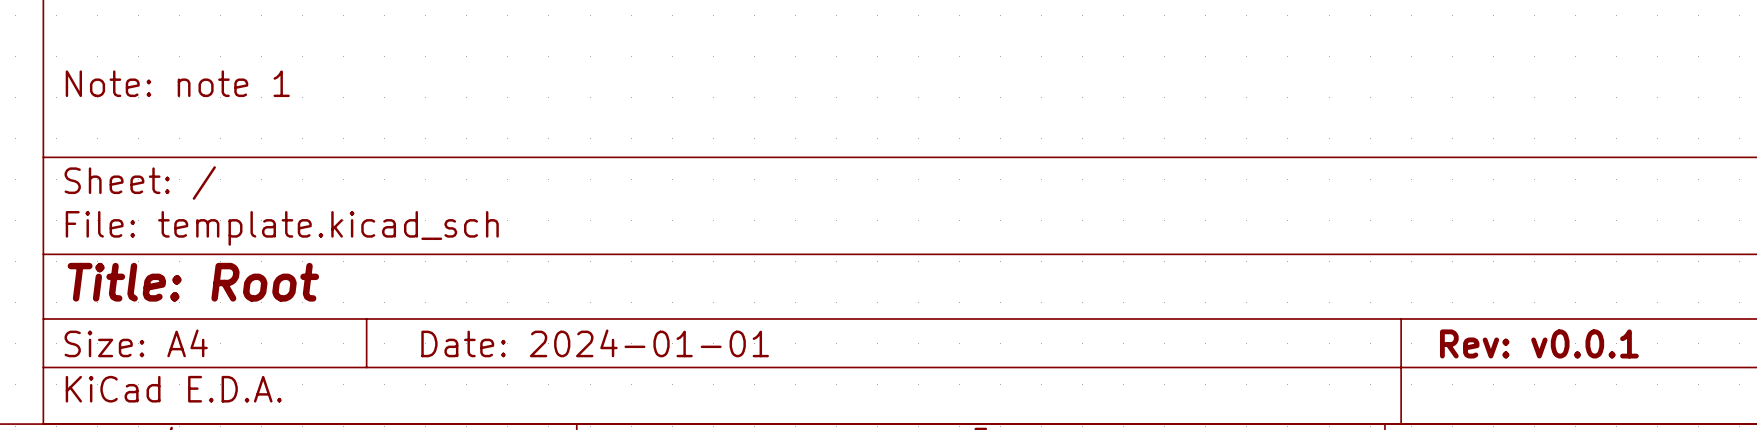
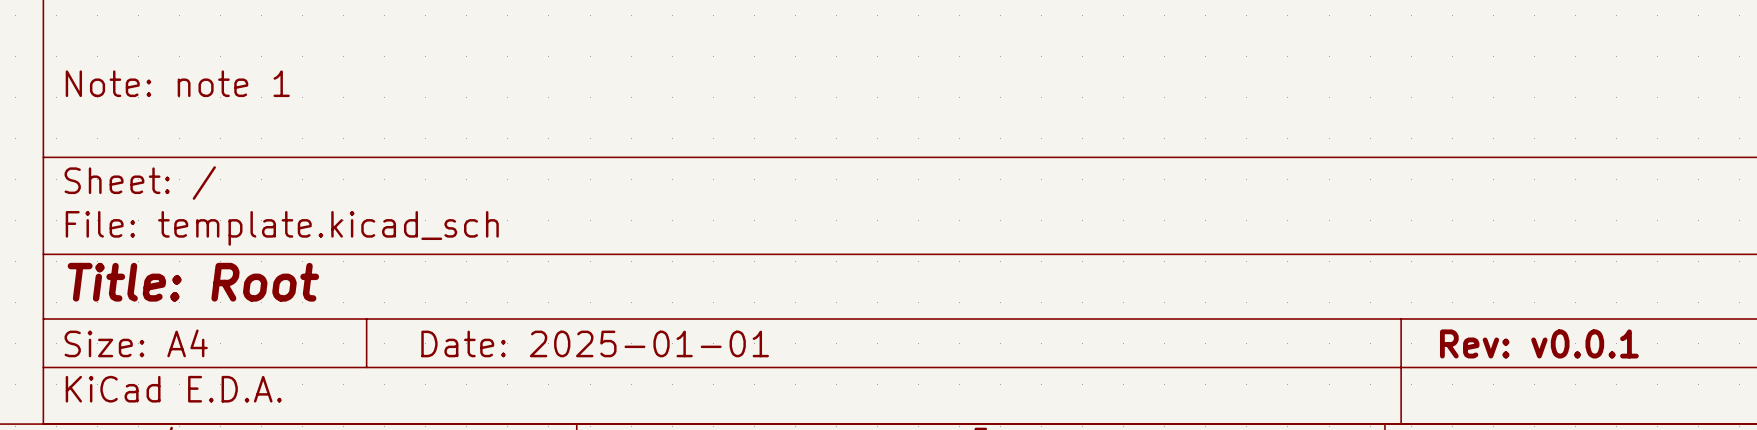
title block: Date: 2024-01-01 (595, 343) -> Date: 2025-01-01 (595, 343)

